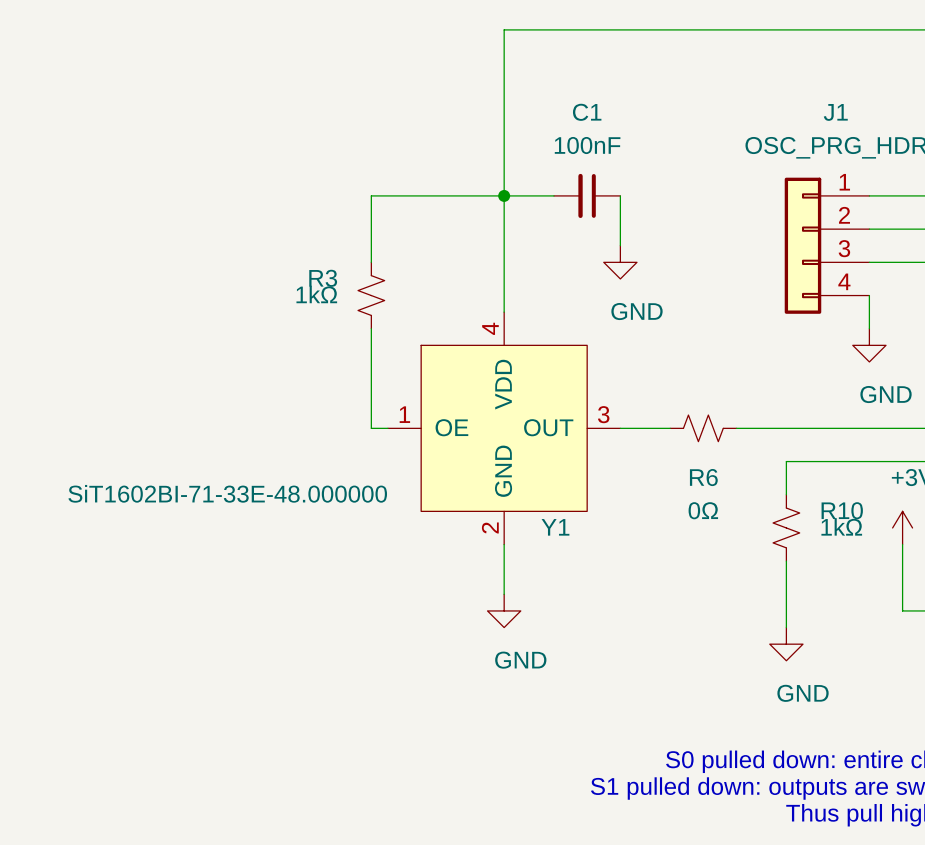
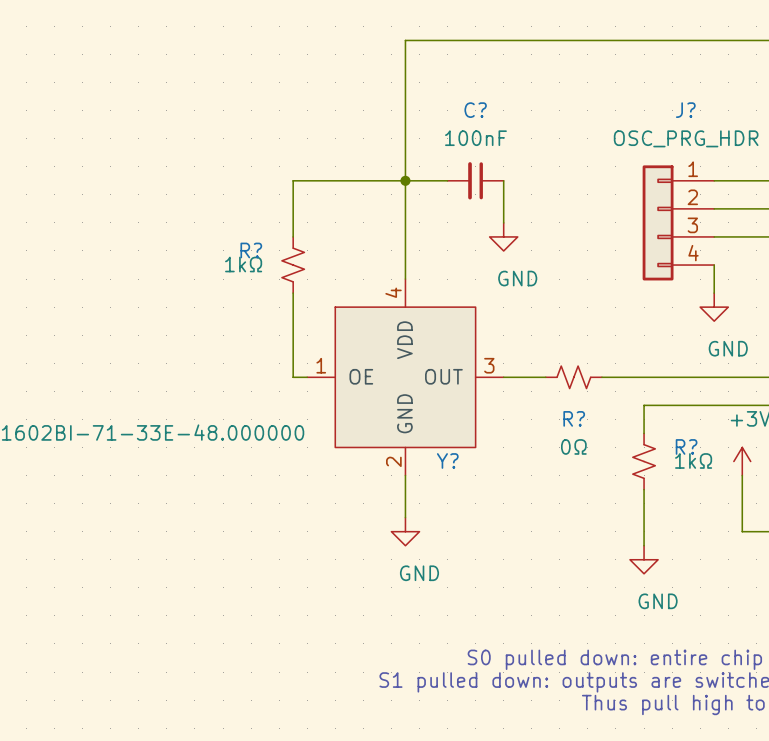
C1 name: C1 (587, 112) -> C? (475, 110)
J1 name: J1 (835, 112) -> J? (685, 110)
R3 name: R3 (323, 278) -> R? (251, 250)
R6 name: R6 (703, 477) -> R? (574, 418)
R10 name: R10 (842, 510) -> R? (686, 446)
Y1 name: Y1 (555, 527) -> Y? (447, 460)

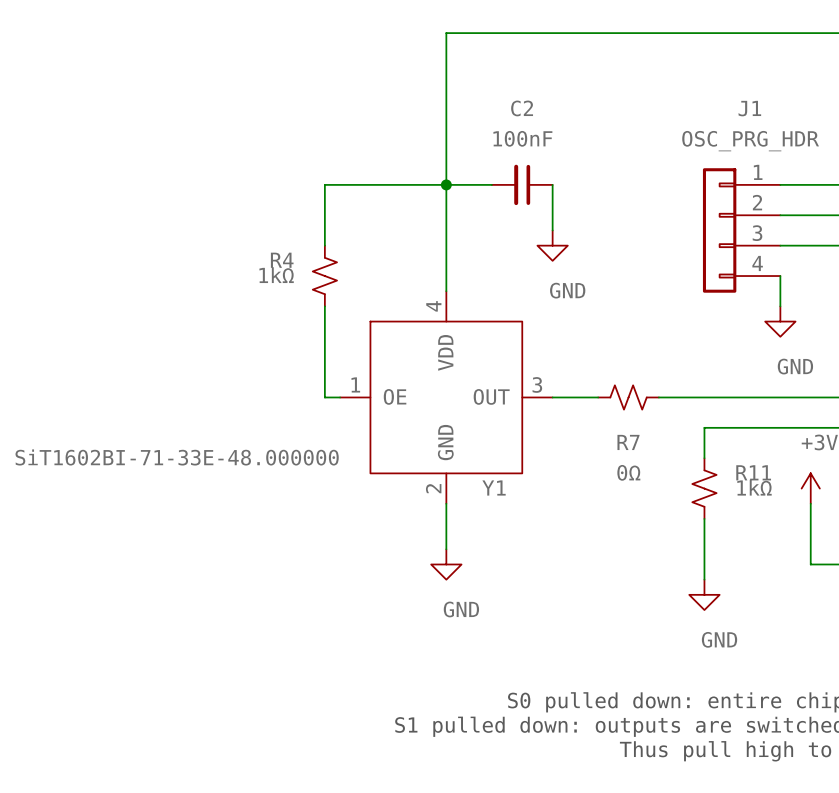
C? name: C? (475, 110) -> C2 (522, 108)
J? name: J? (685, 110) -> J1 (749, 108)
R? name: R? (251, 250) -> R4 (282, 260)
R? name: R? (574, 418) -> R7 (628, 442)
R? name: R? (686, 446) -> R11 (753, 472)
Y? name: Y? (447, 460) -> Y1 (494, 488)

